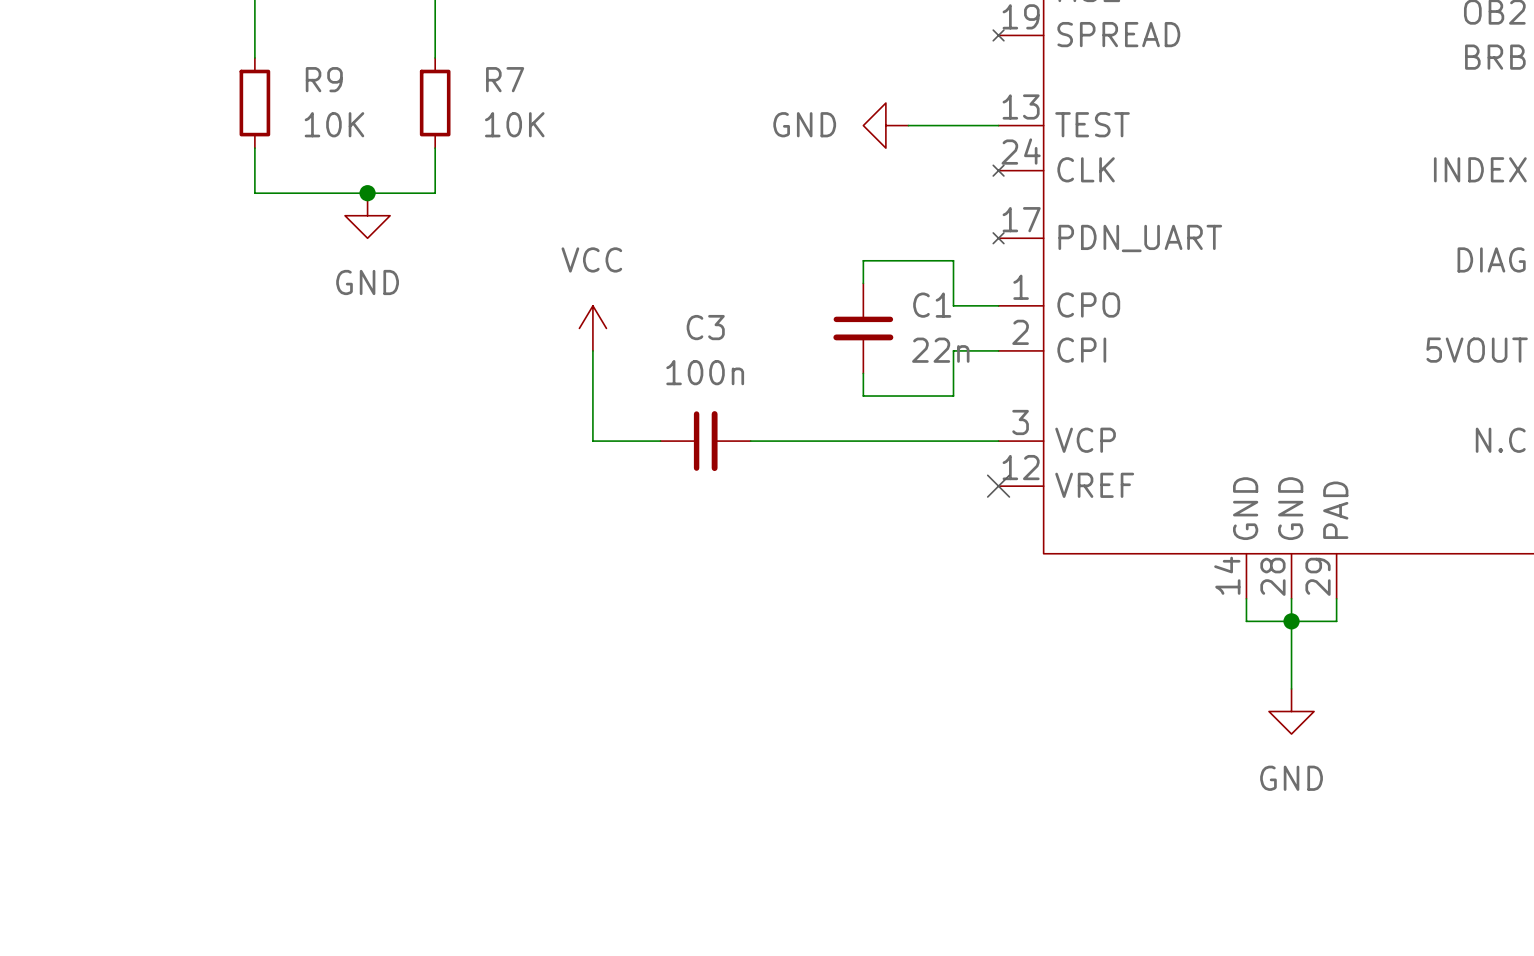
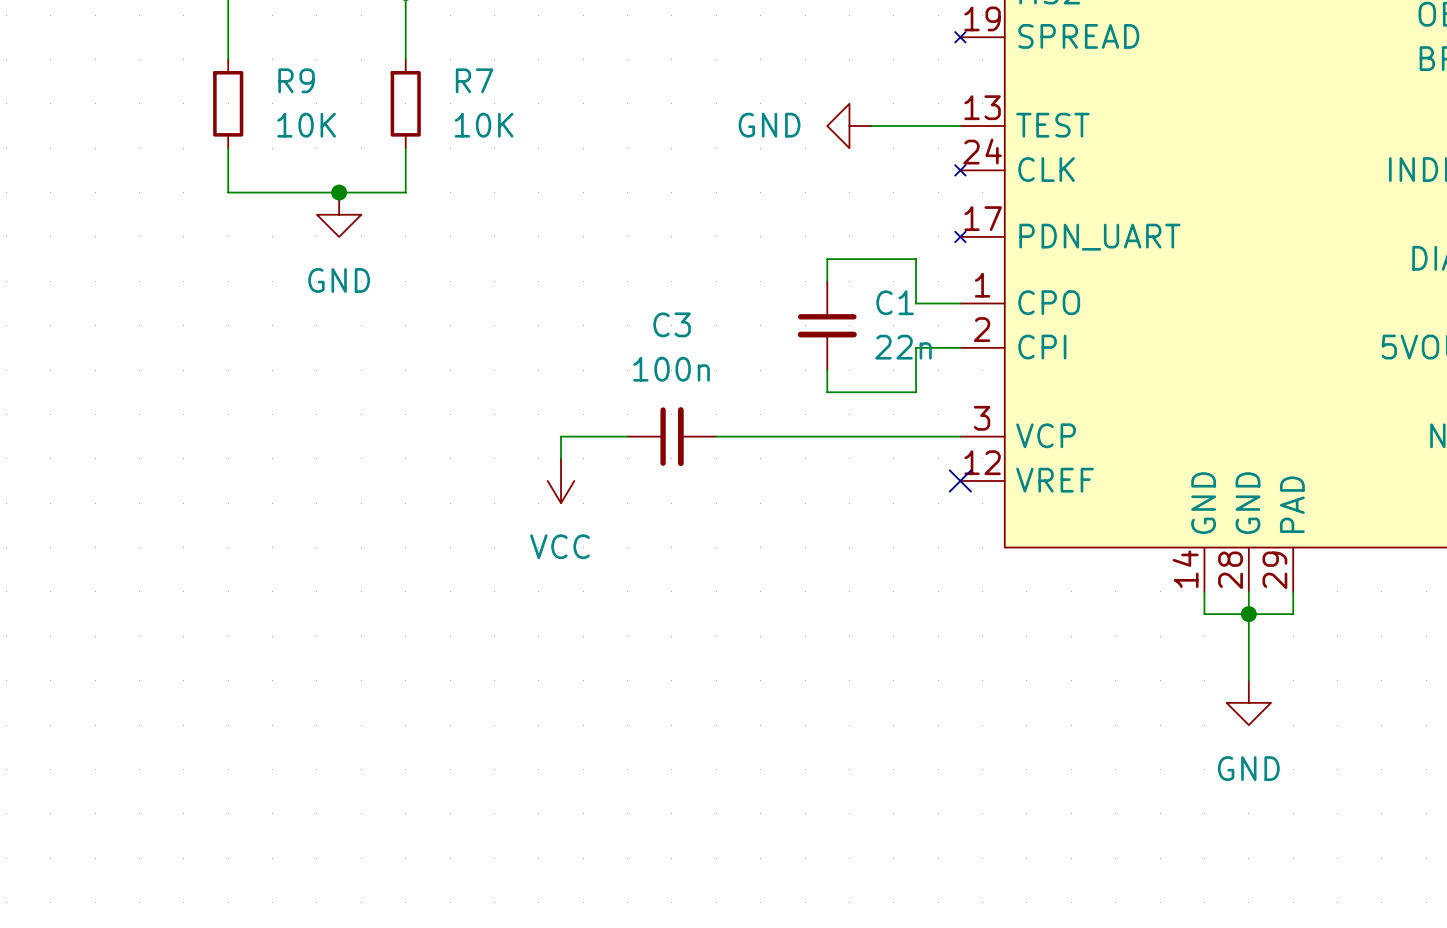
power symbol rotation: 0° (592, 328) -> 180° (561, 480)
power symbol position: VCC (592, 328) -> VCC (561, 480)
wire: (592, 350) (592, 441) -> (561, 458) (561, 436)

